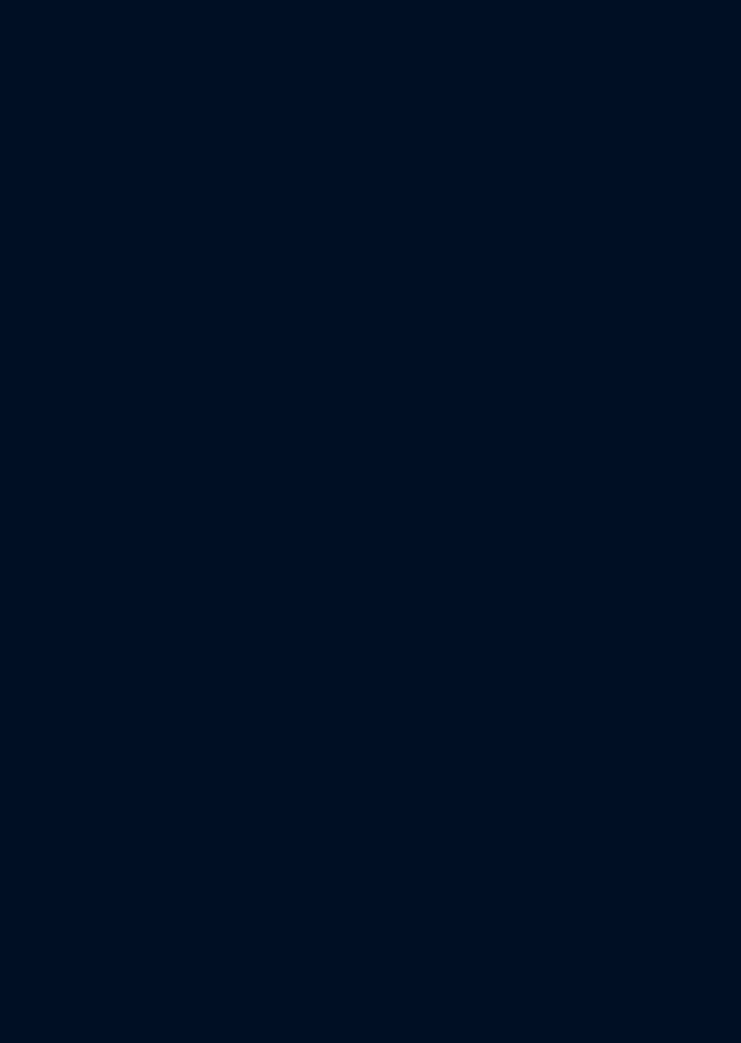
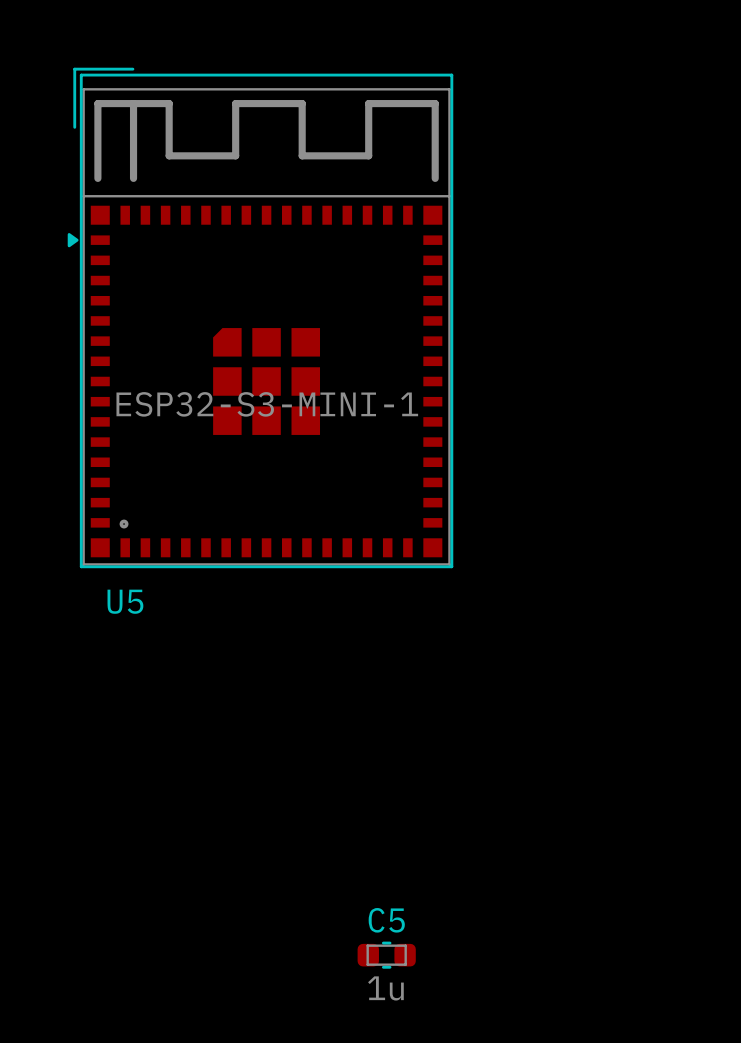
U5: none -> ESP32-S3-MINI-1 (260, 317)
C5: none -> 1u (386, 955)

